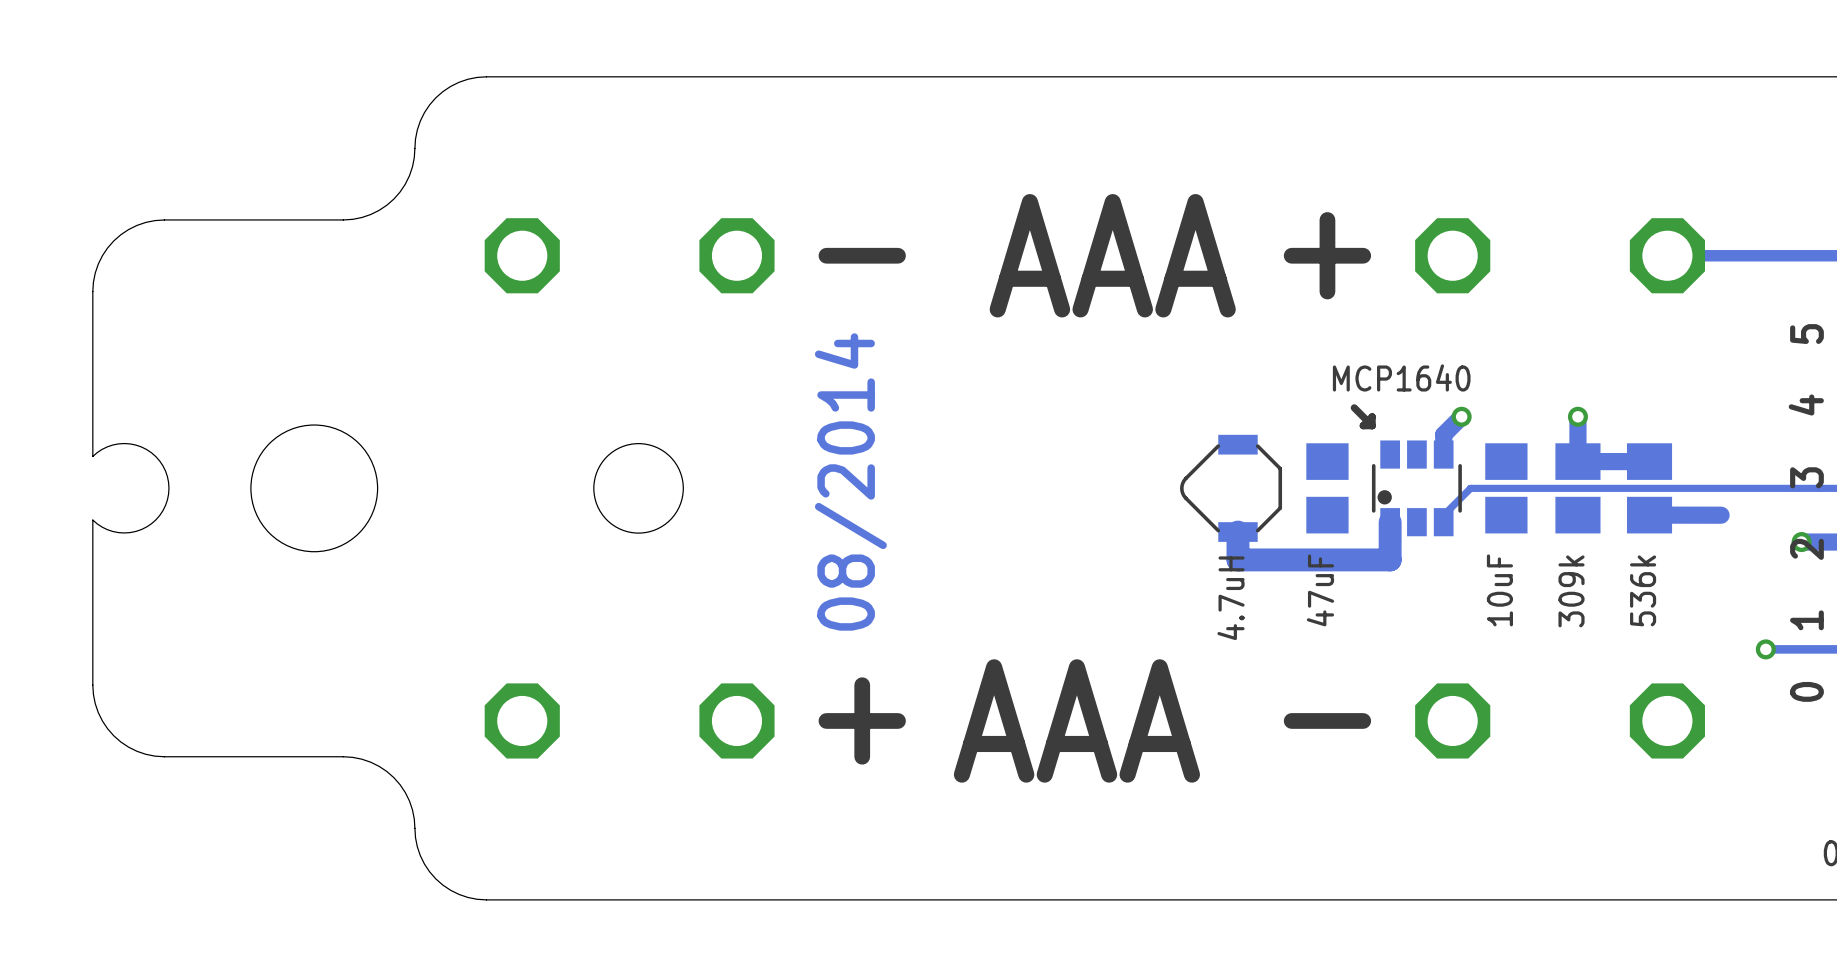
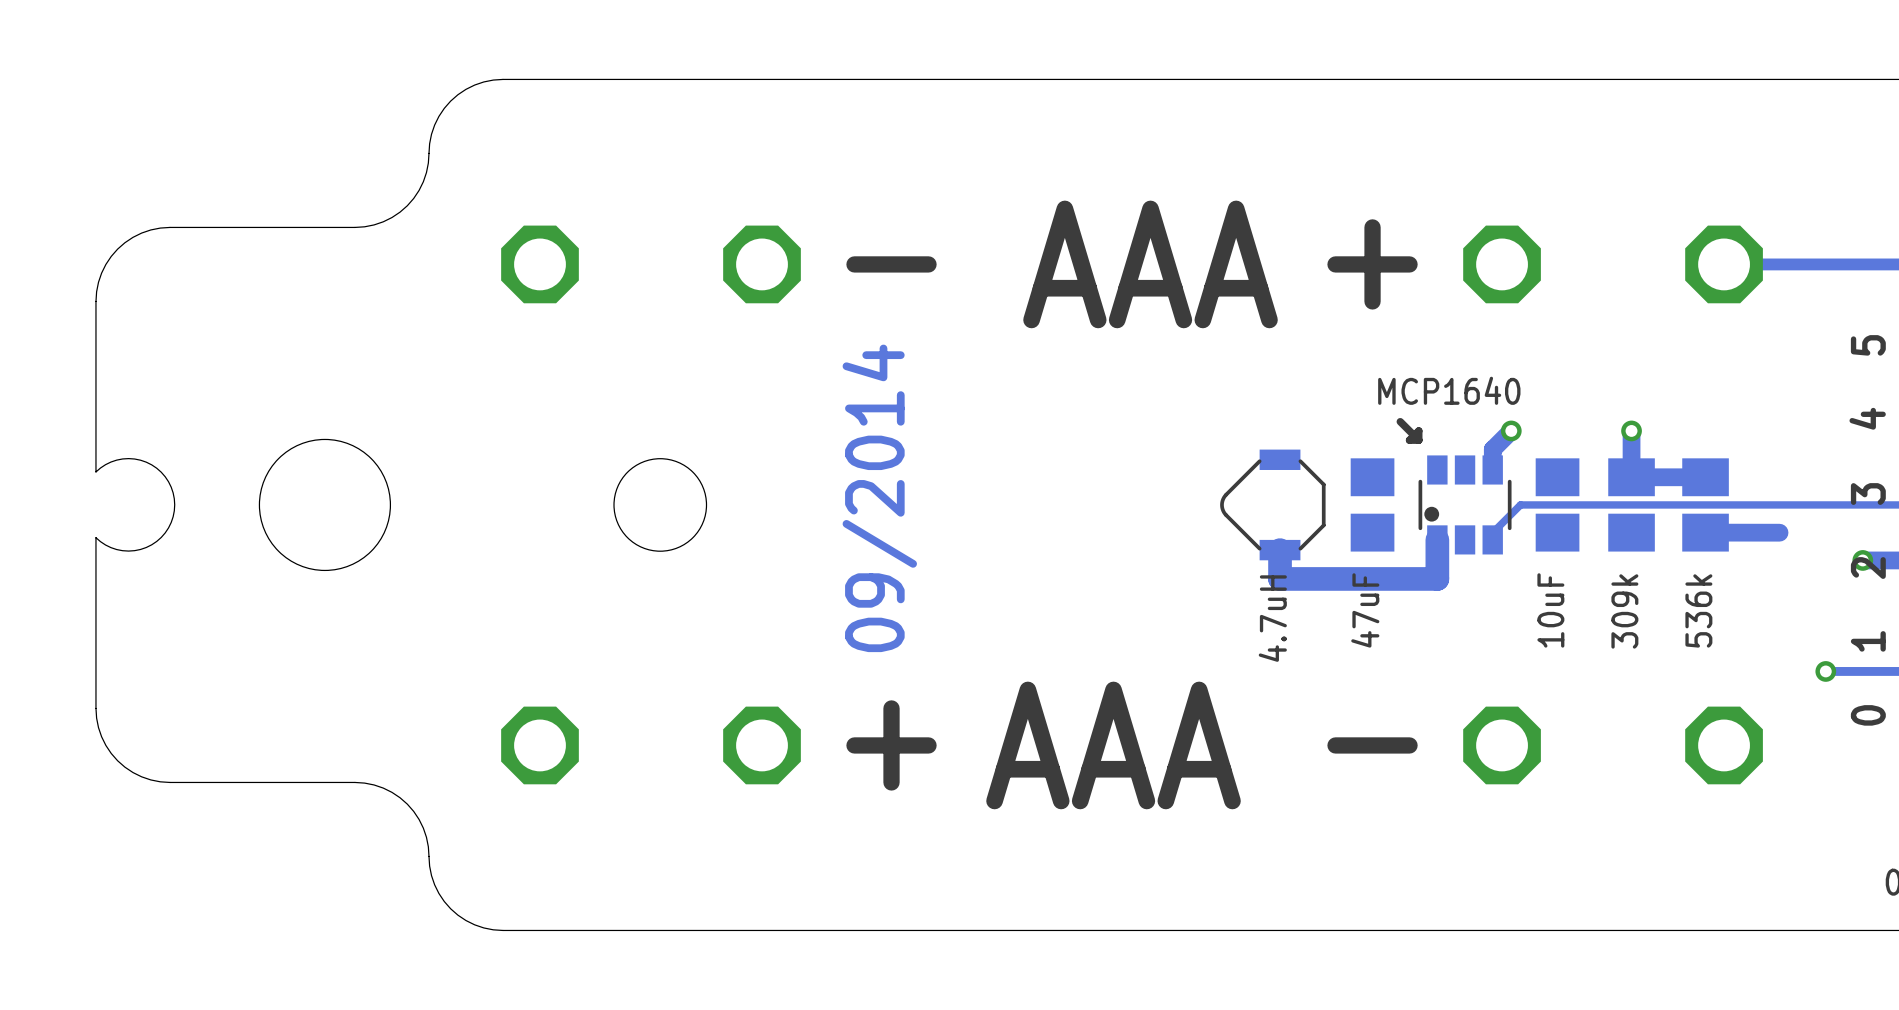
text: 08/2014 (850, 481) -> 09/2014 (879, 498)

